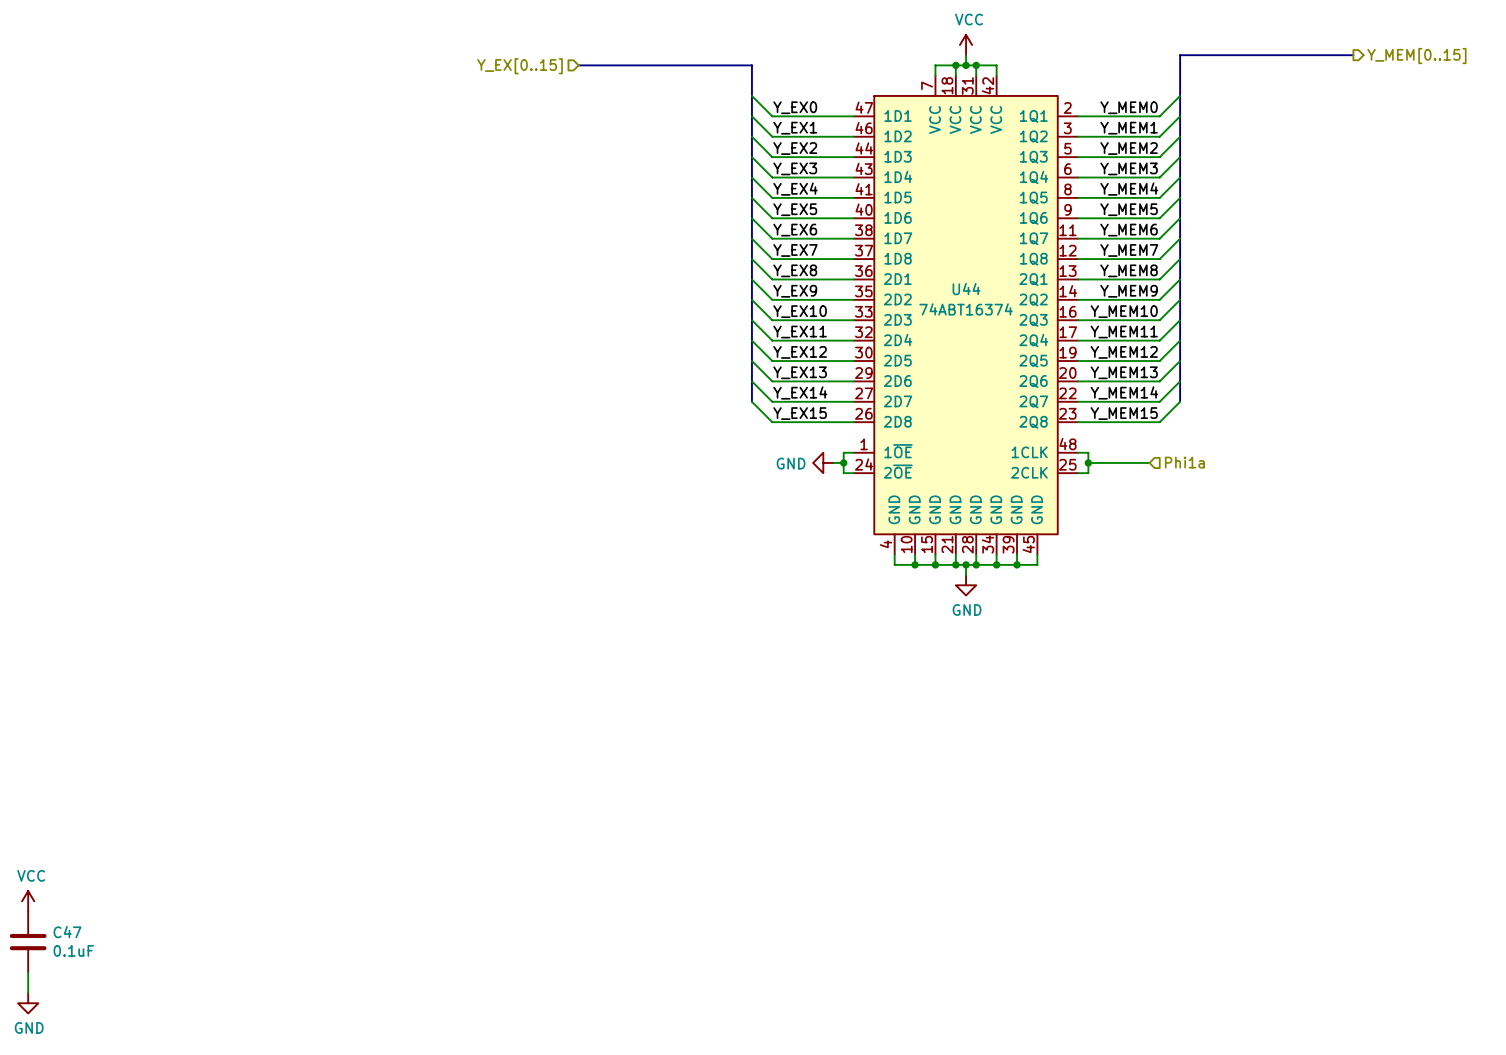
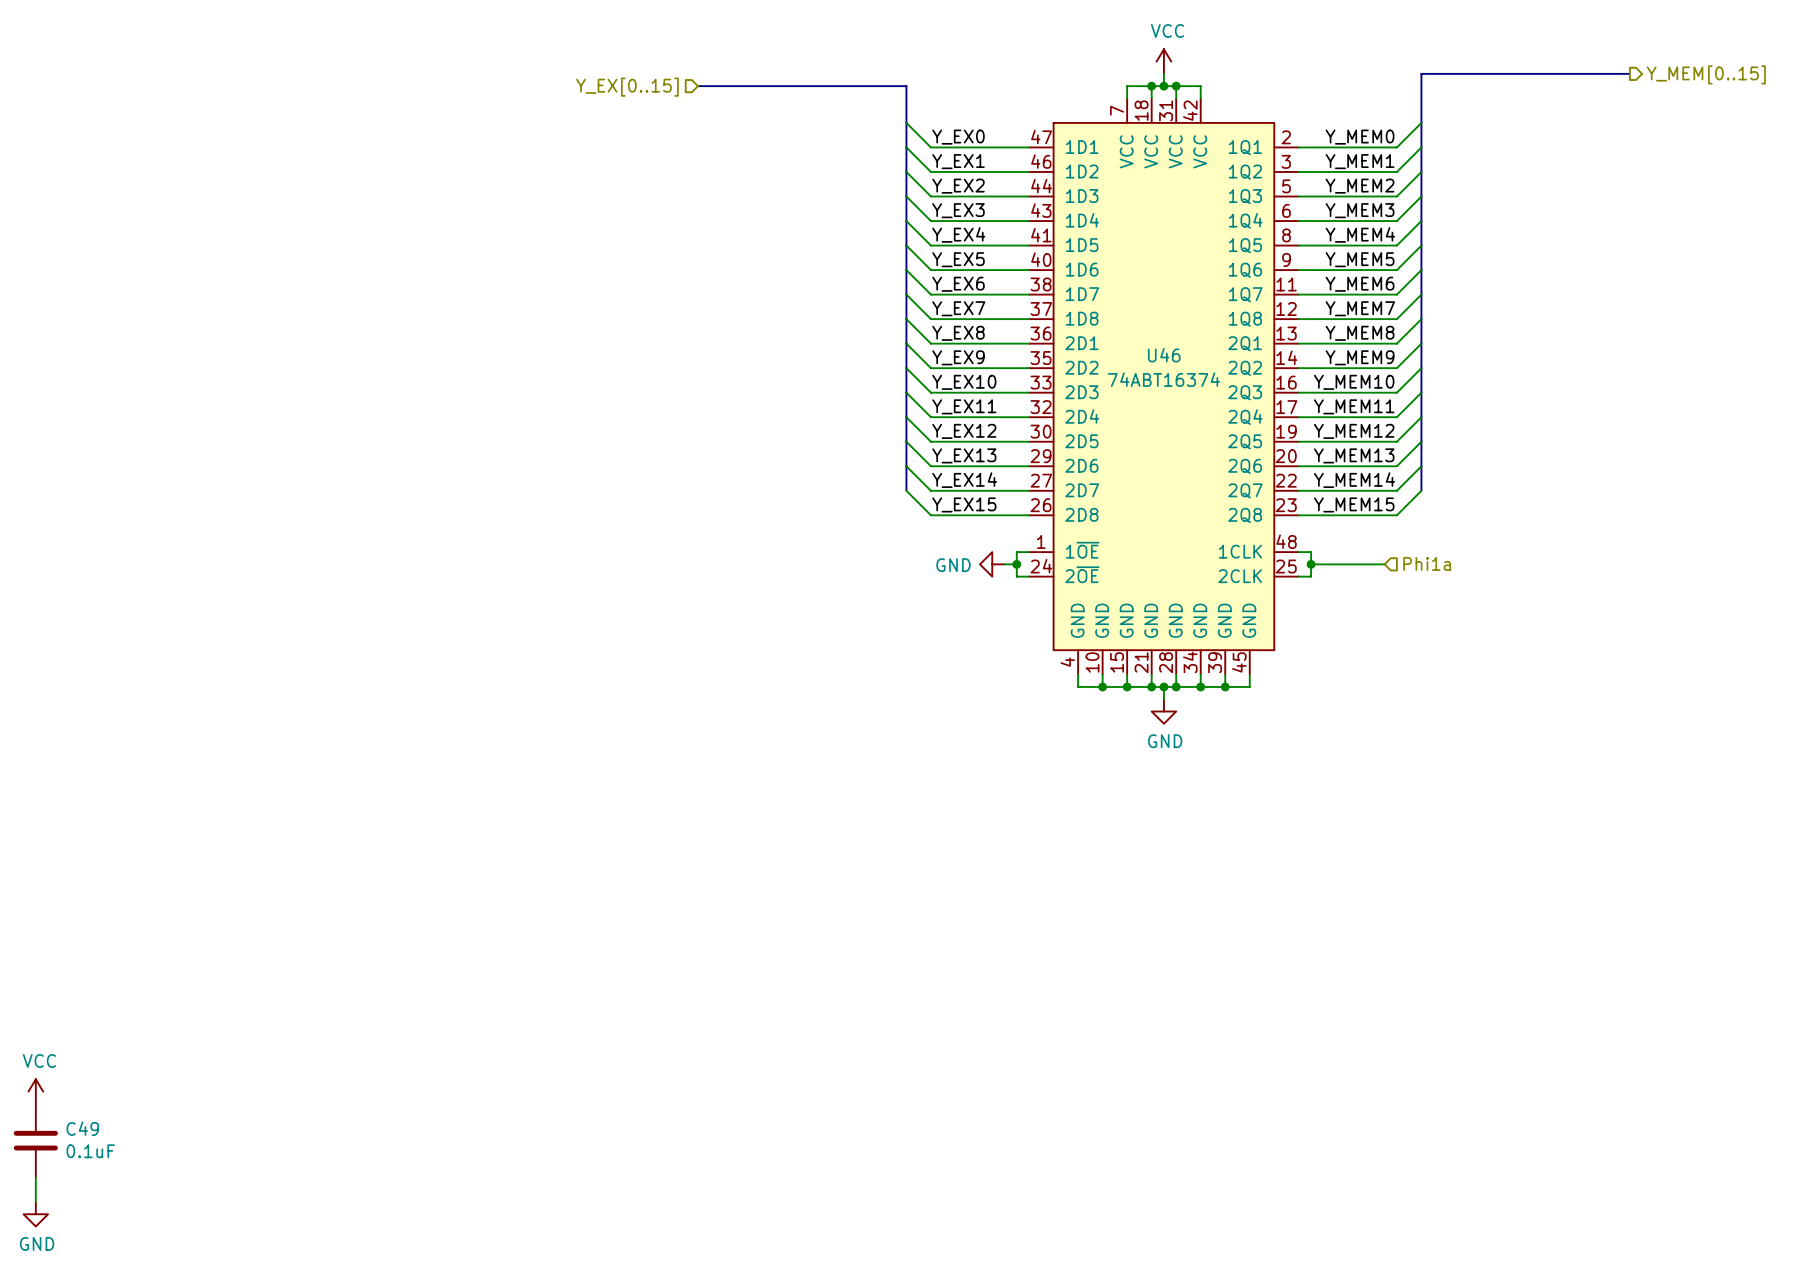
U44 name: U44 (966, 289) -> U46 (1164, 355)
C47 name: C47 (67, 932) -> C49 (82, 1128)

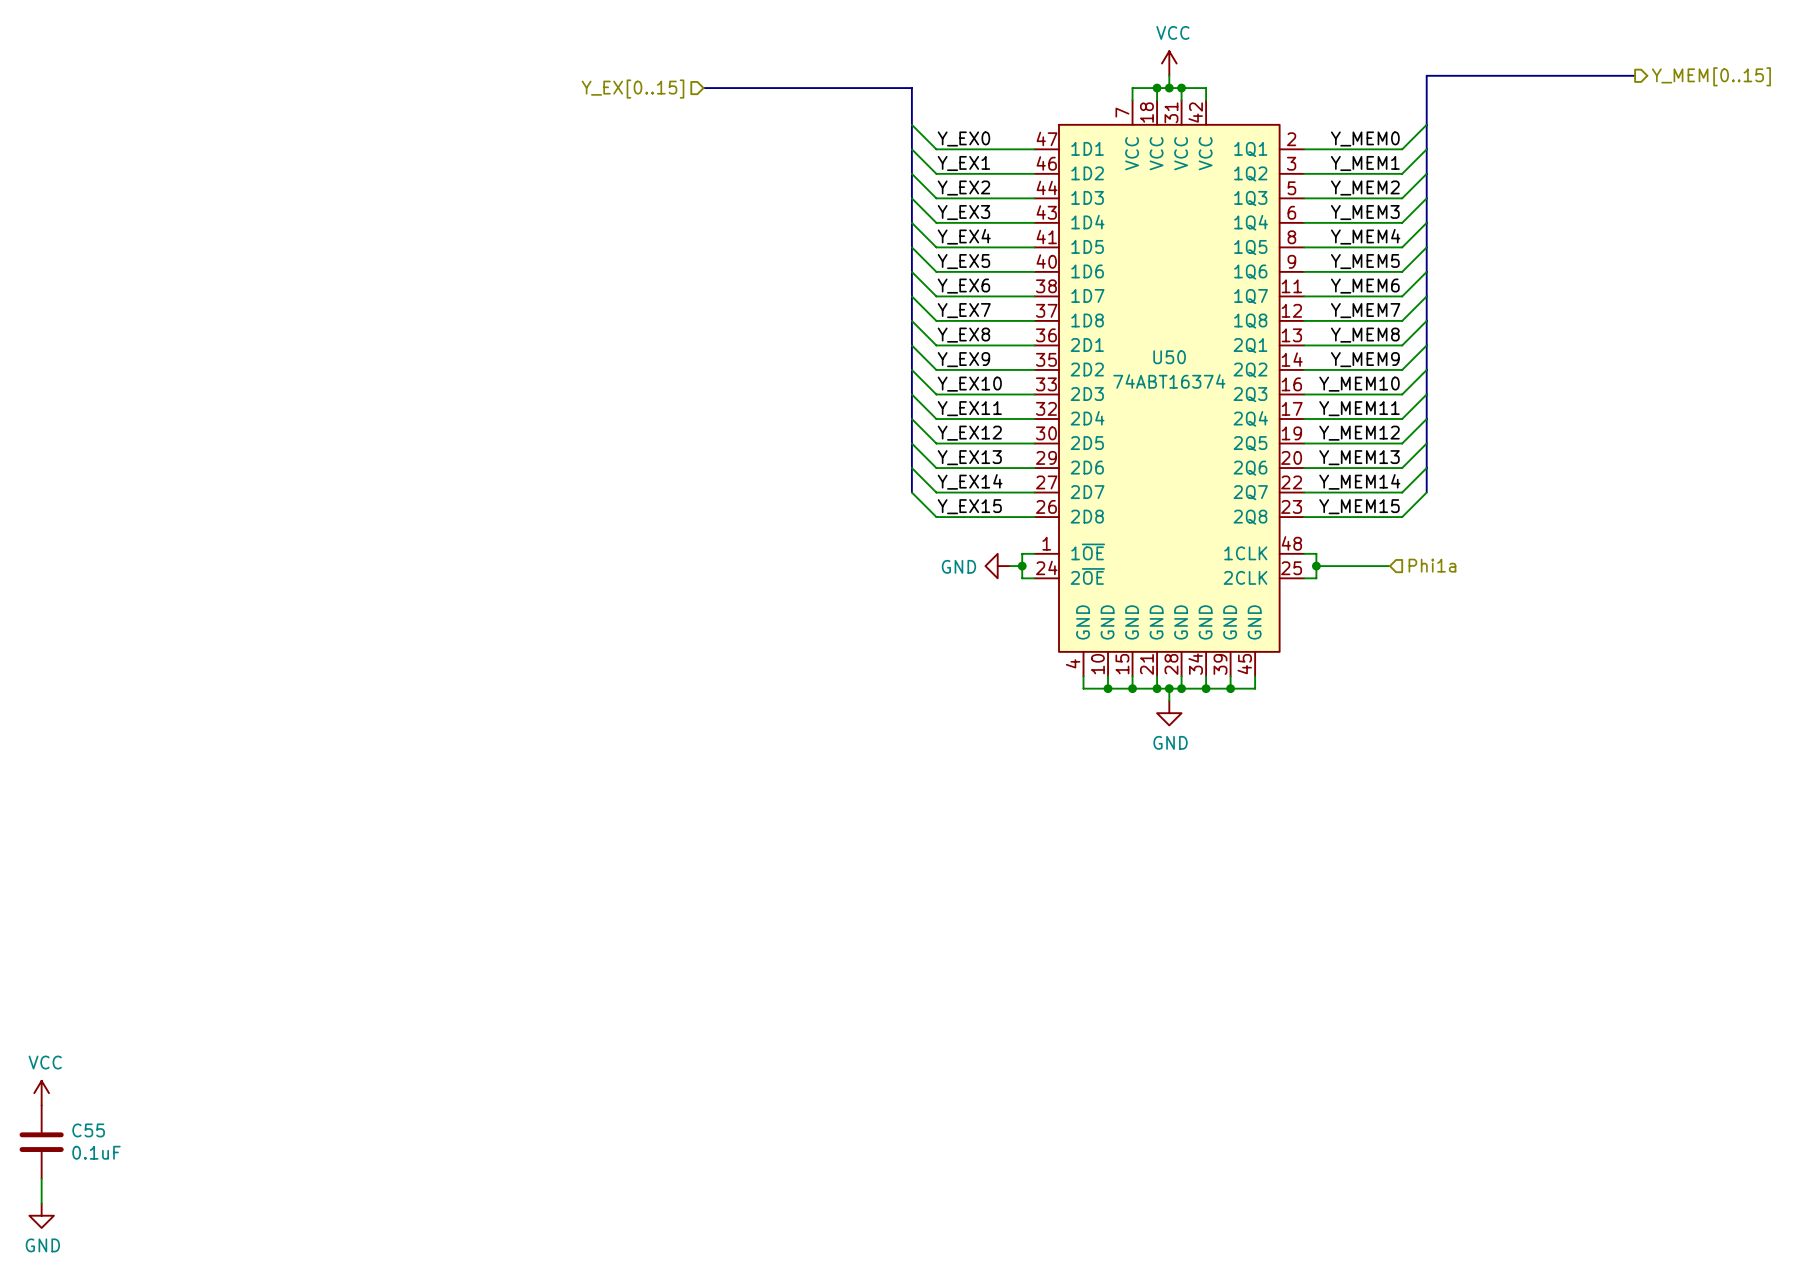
U46 name: U46 (1164, 355) -> U50 (1169, 357)
C49 name: C49 (82, 1128) -> C55 (88, 1130)

